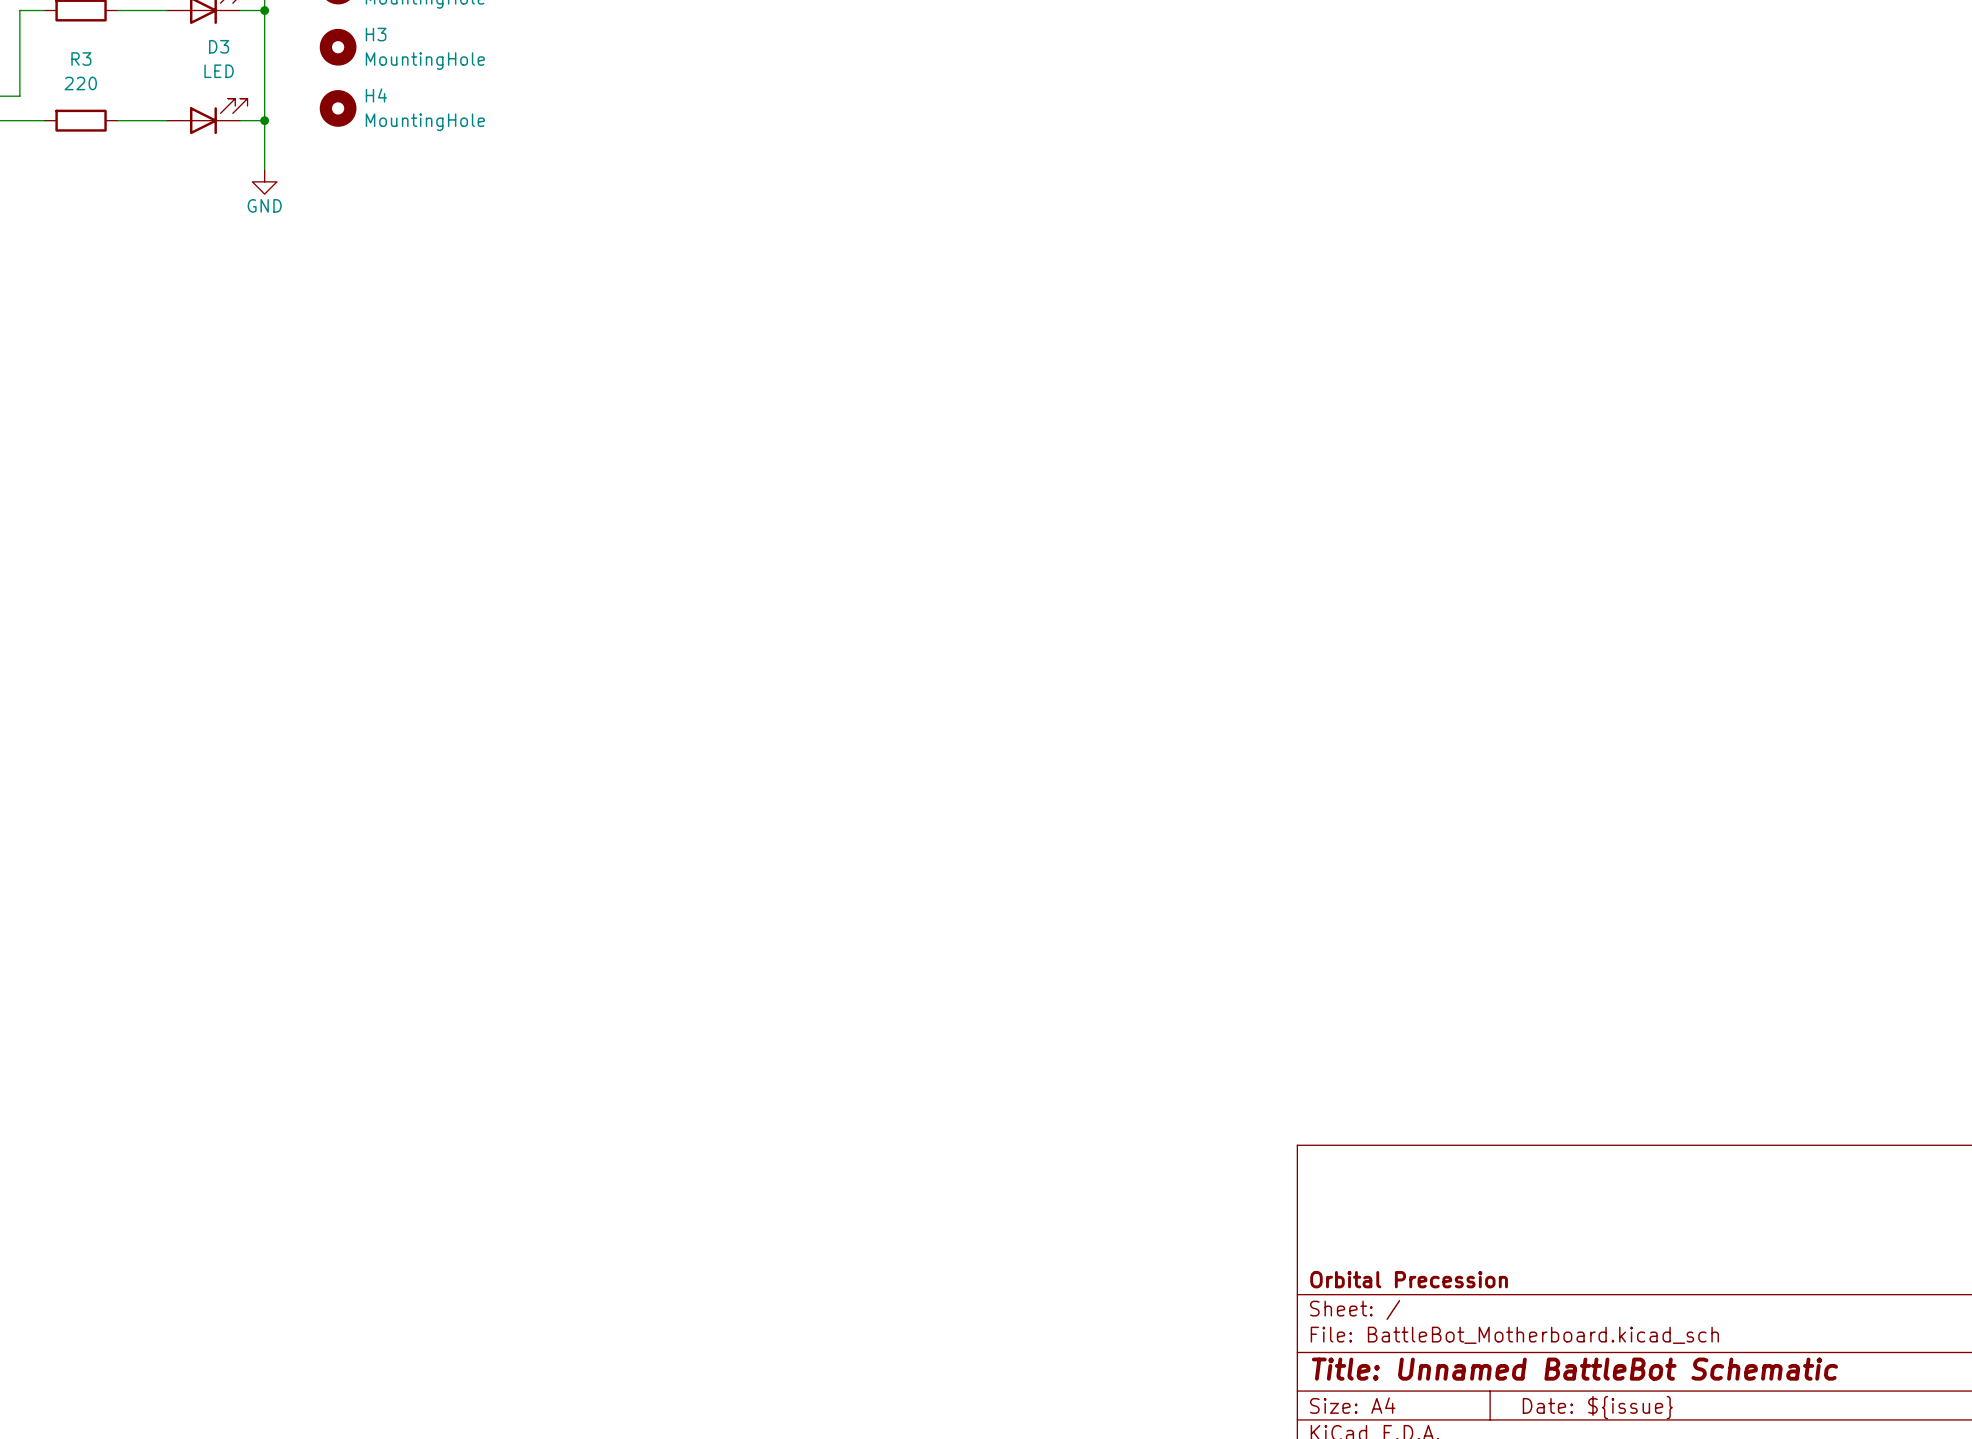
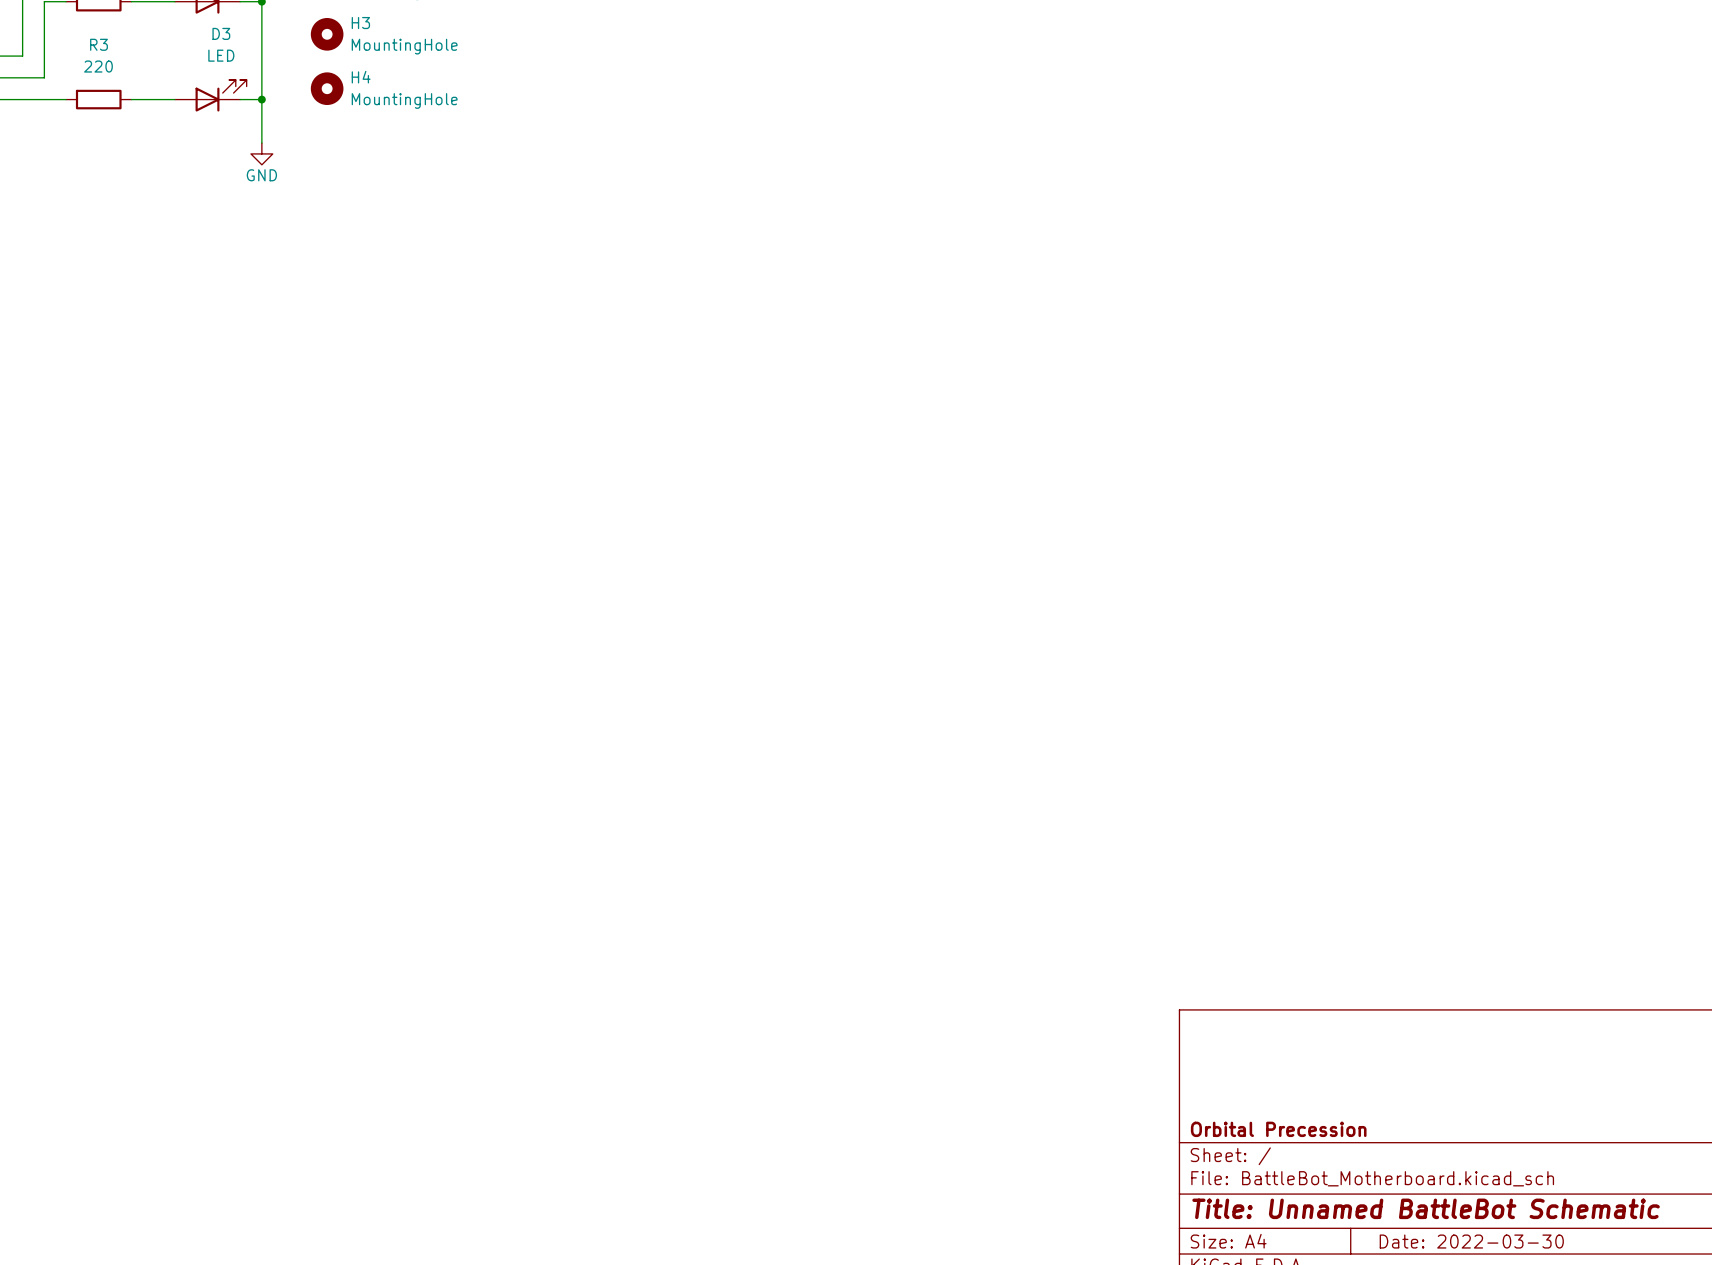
title block: Date: ${issue} (1597, 1407) -> Date: 2022-03-30 (1471, 1241)

